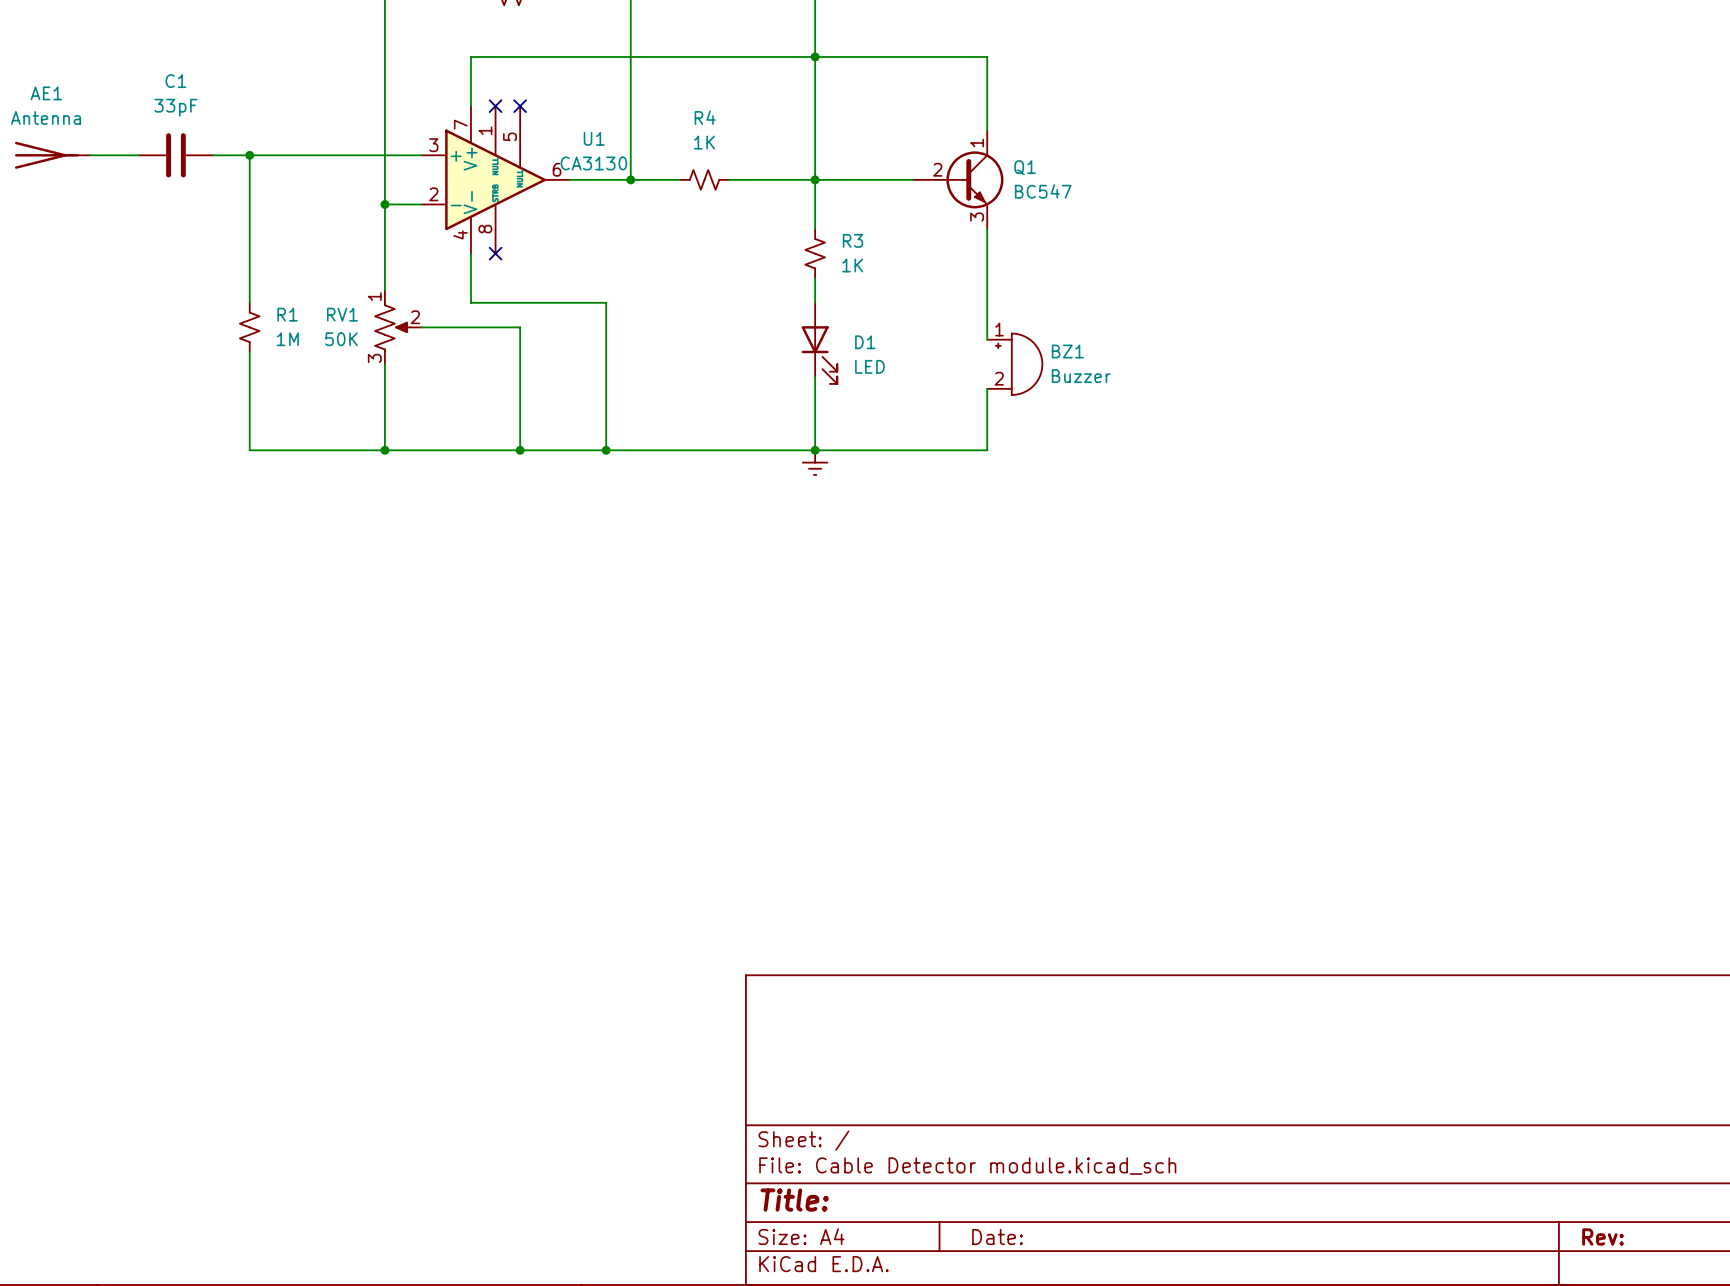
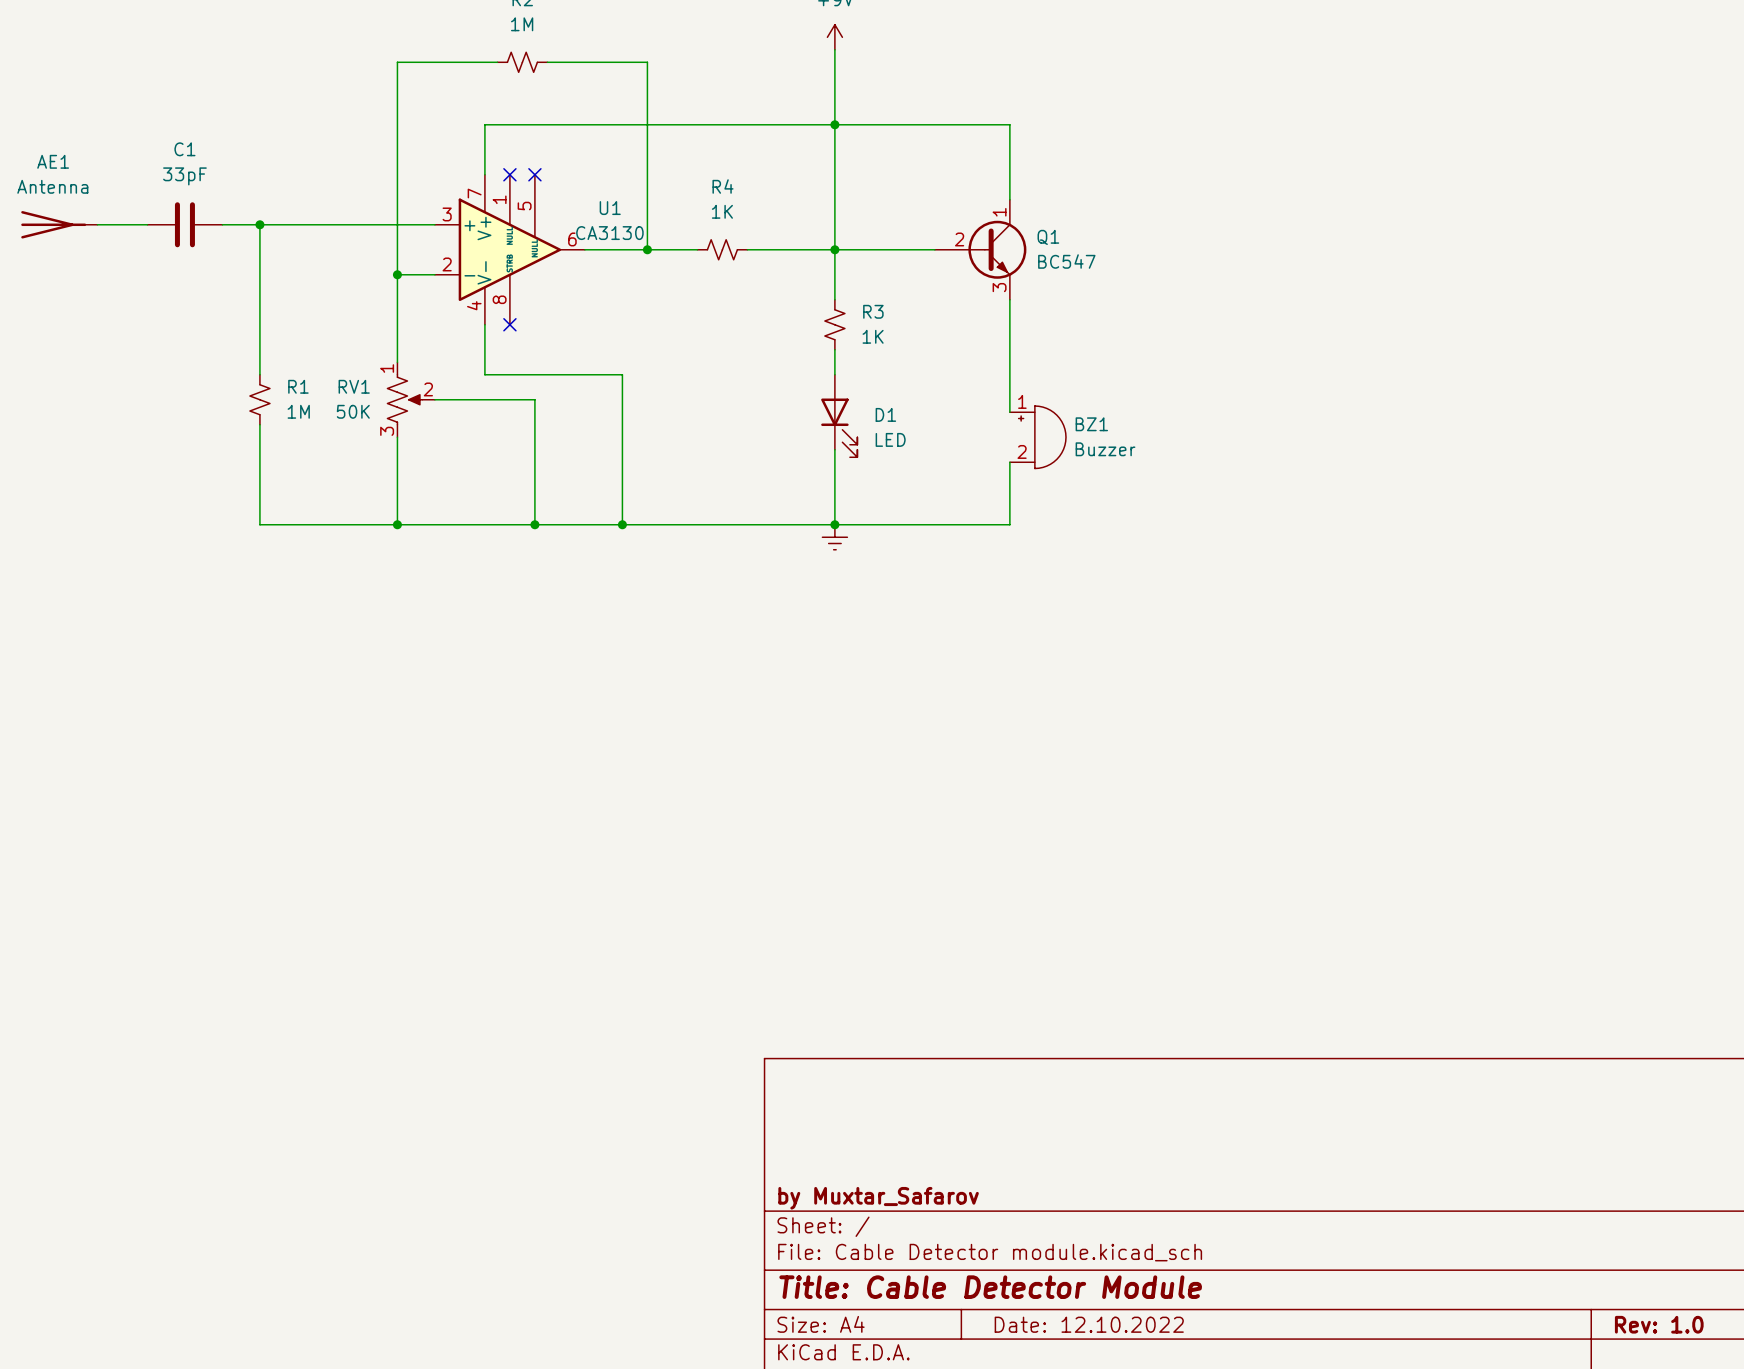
title block: none -> by Muxtar_Safarov (878, 1198)
title block: Title: (794, 1200) -> Title: Cable Detector Module (990, 1287)
title block: Date: (997, 1237) -> Date: 12.10.2022 (1089, 1324)
title block: Rev: (1603, 1237) -> Rev: 1.0 (1659, 1324)

